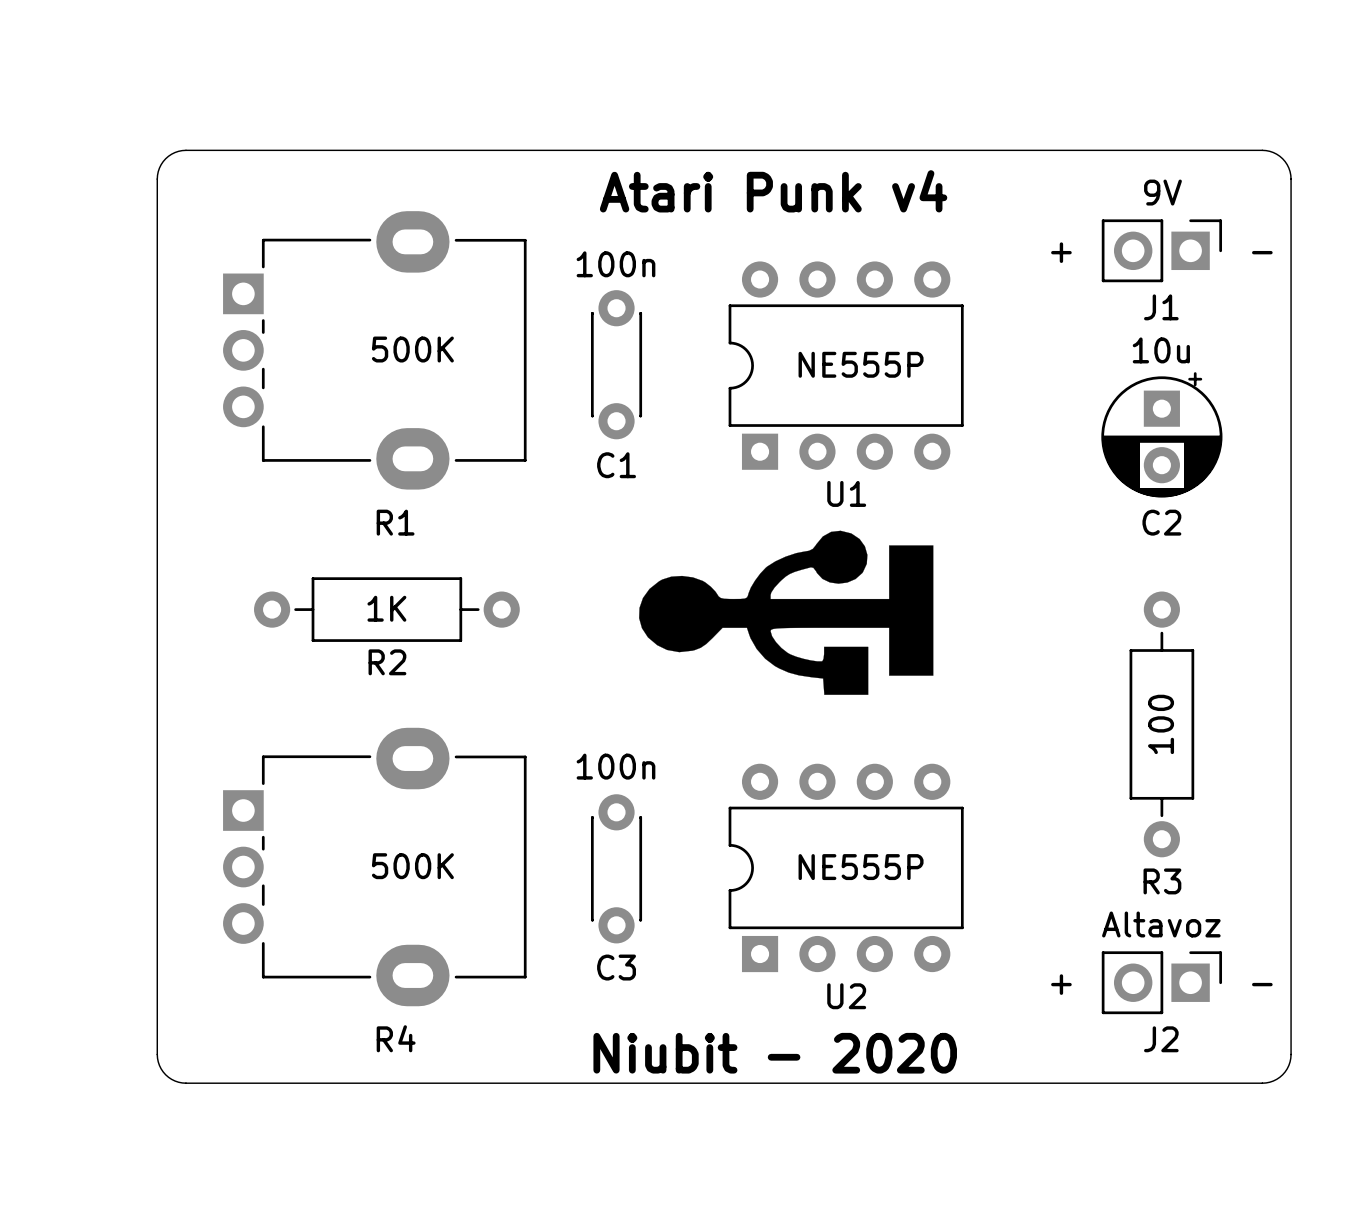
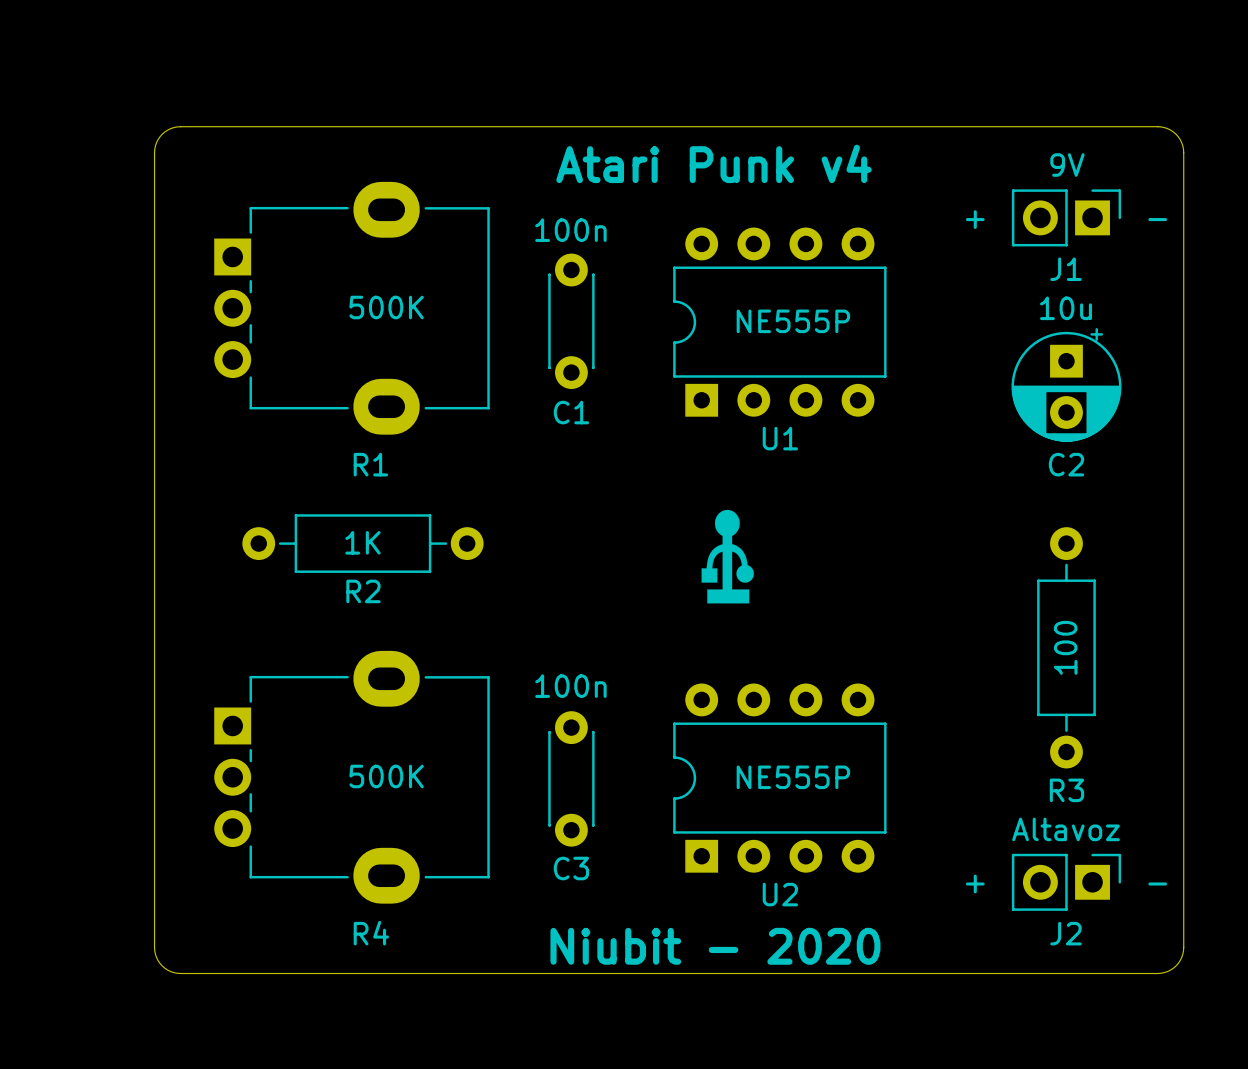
drawing shape: [639, 530, 934, 695] -> [701, 509, 754, 604]

